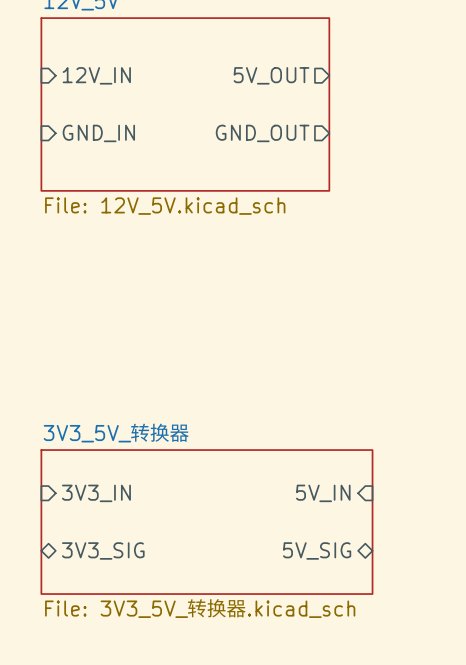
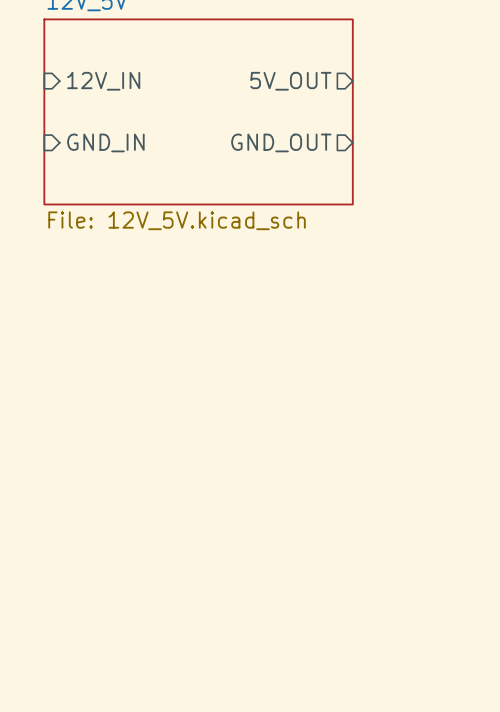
sheet pin: 3V3_IN (96, 493) -> none
sheet pin: 5V_IN (323, 493) -> none
sheet 3V3_5V_转换器: File: 3V3_5V_转换器.kicad_sch (206, 522) -> none
sheet pin: 3V3_SIG (103, 550) -> none
sheet pin: 5V_SIG (317, 550) -> none

